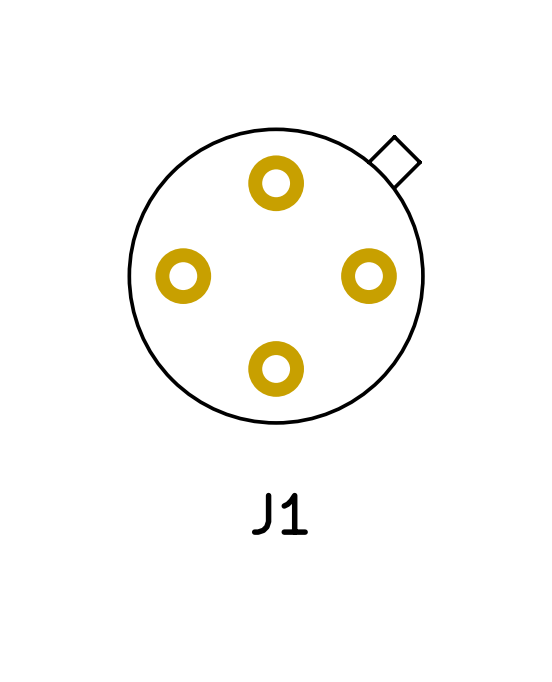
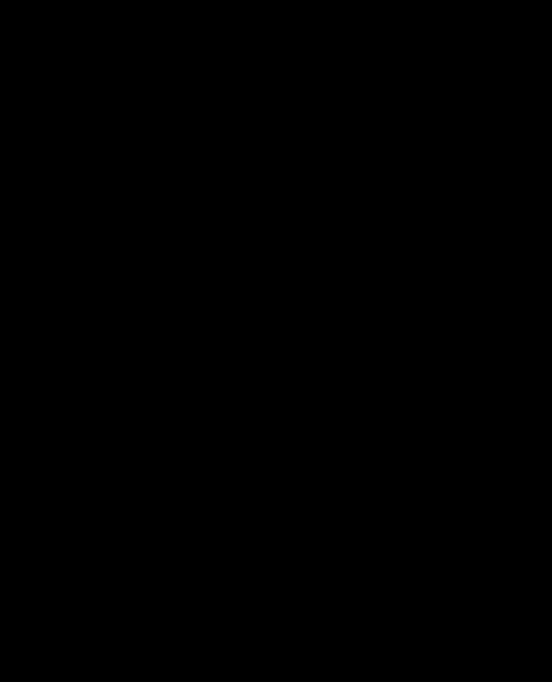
J1: (276, 276) -> none

